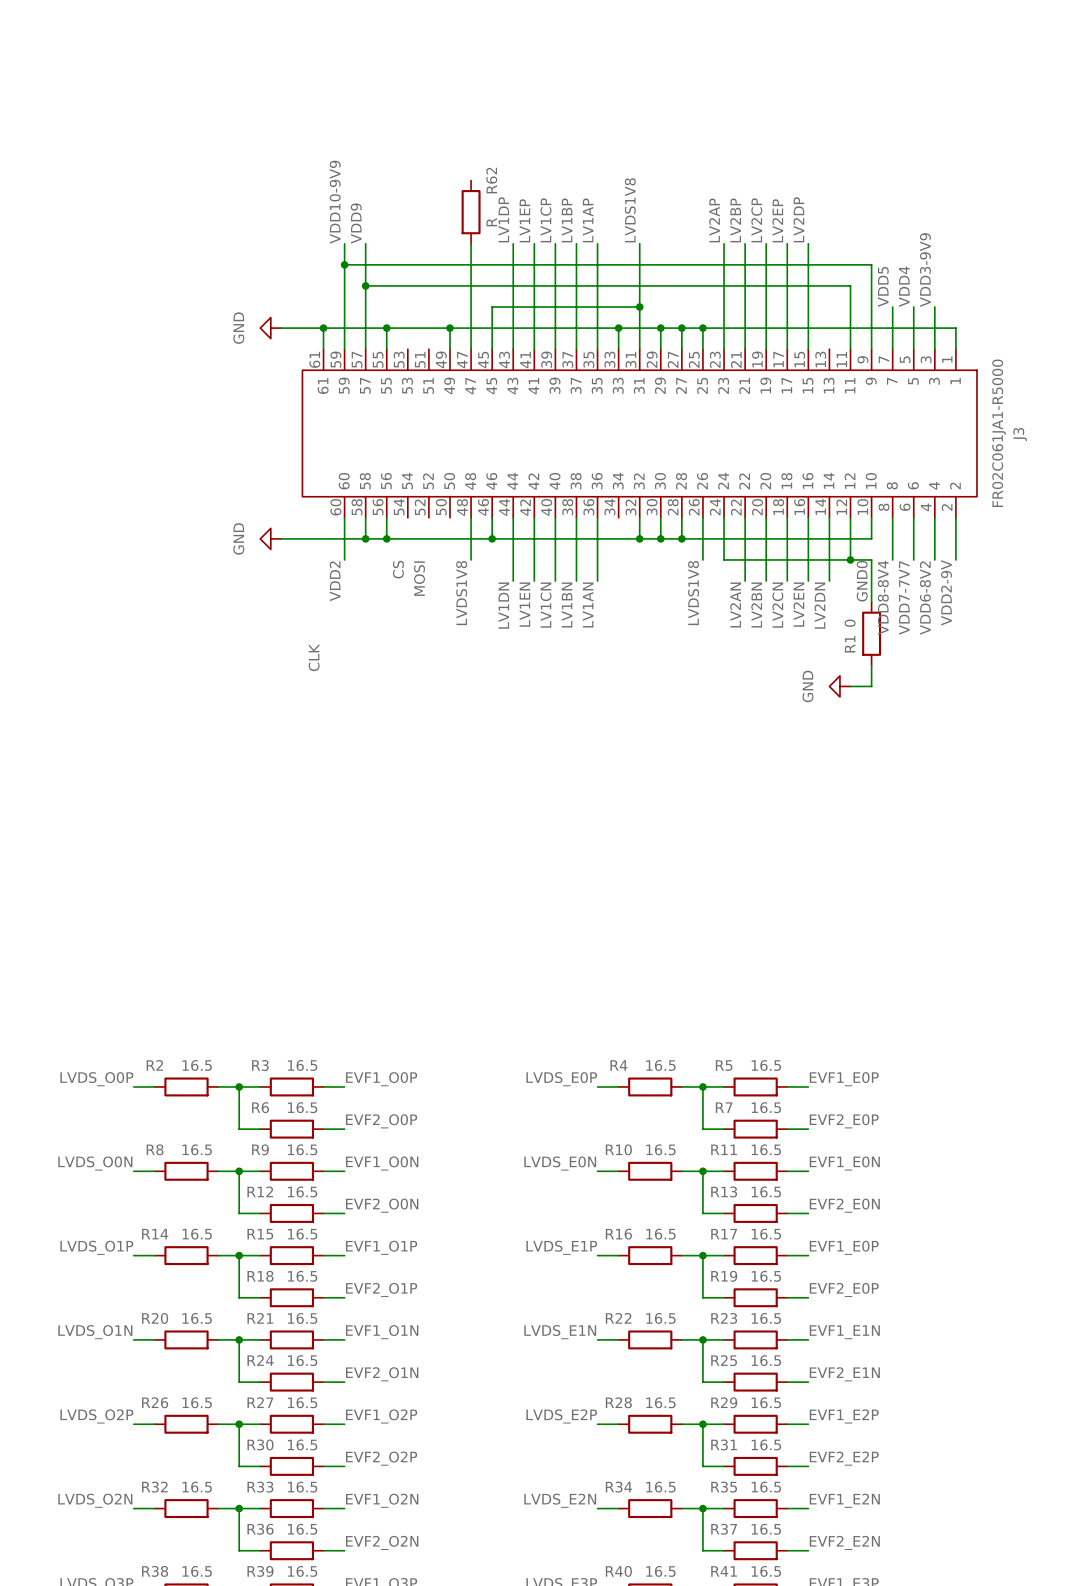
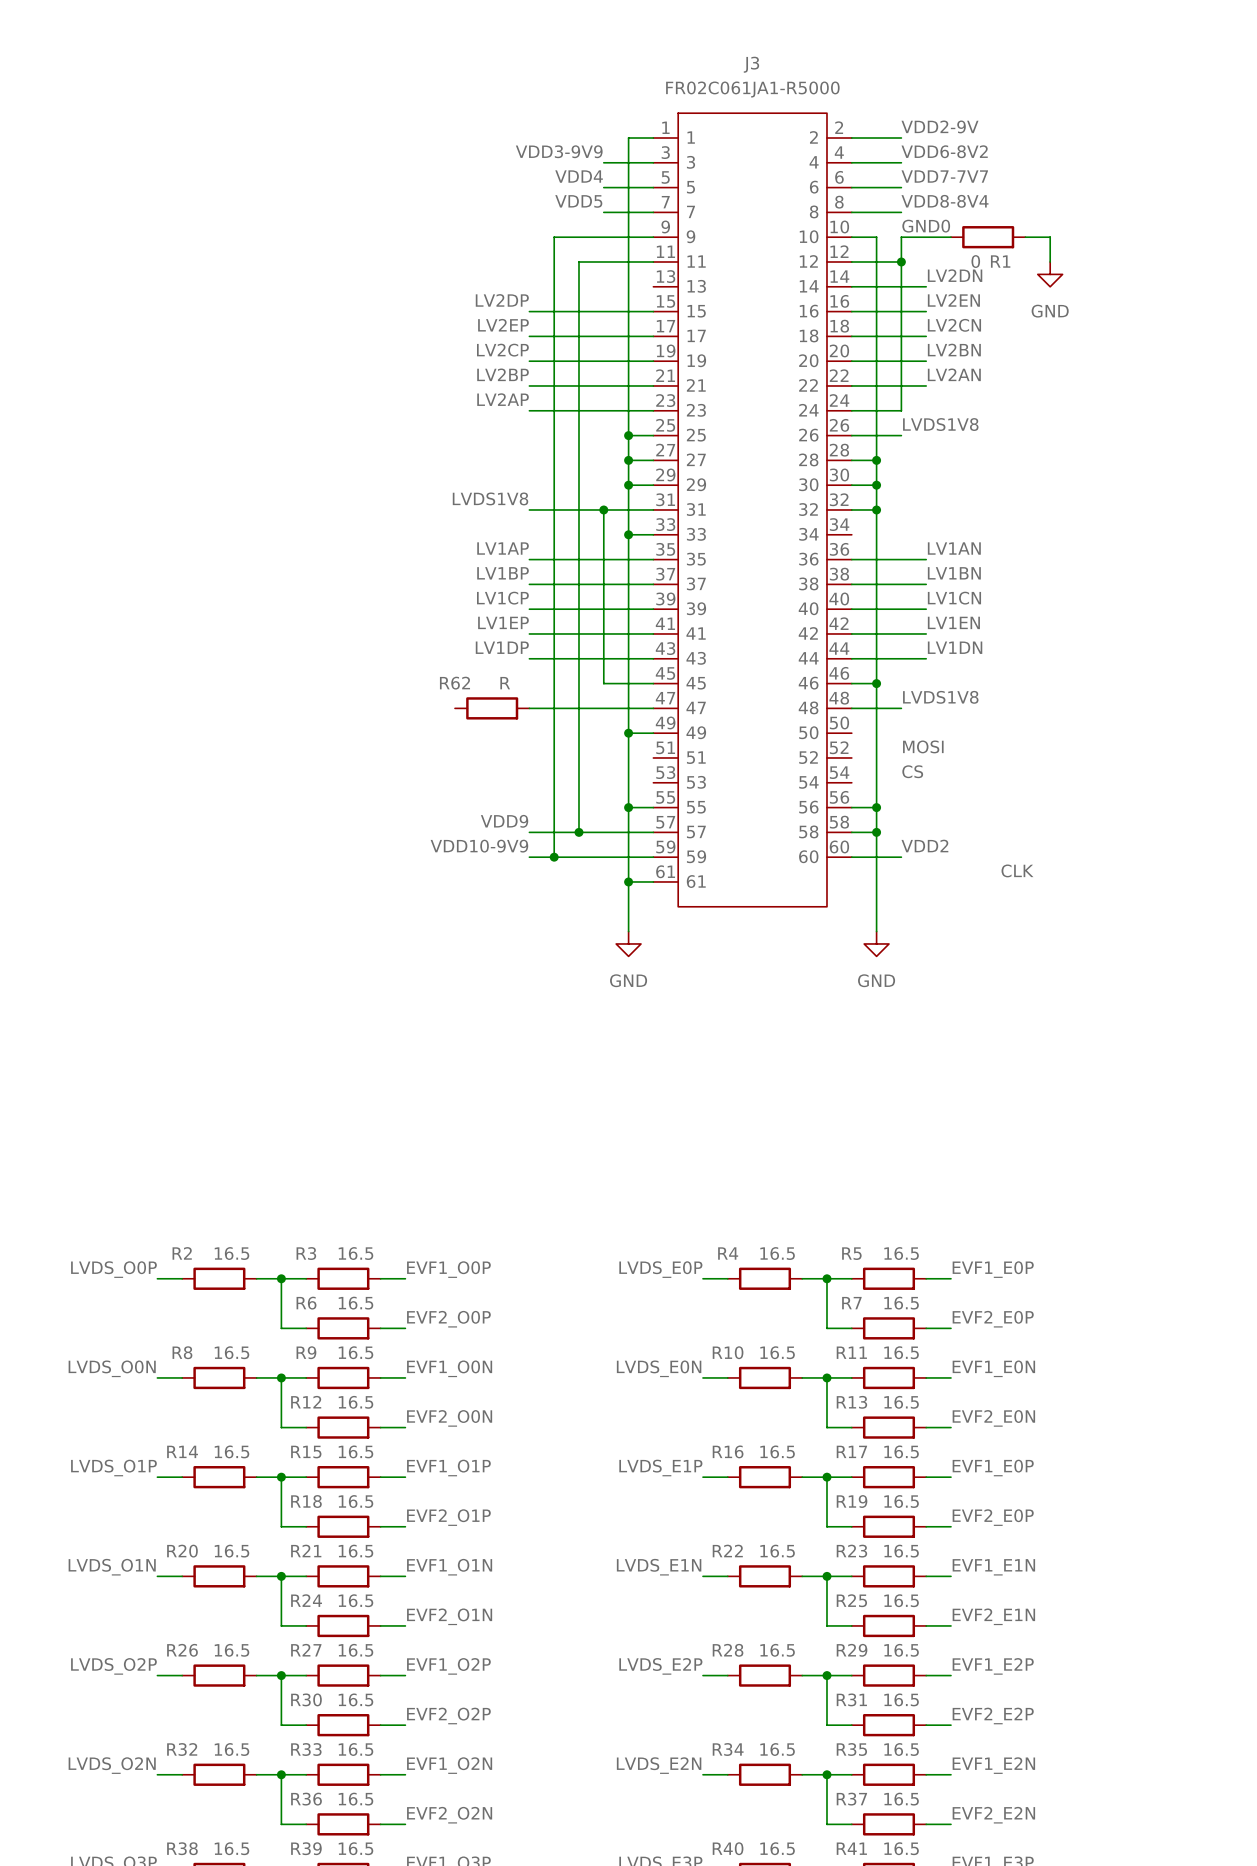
label: none -> VDD2-9V (940, 126)
wire: none -> (653, 138) (628, 138) (628, 286)
wire: none -> (851, 138) (901, 138)
label: none -> VDD3-9V9 (559, 151)
label: none -> VDD6-8V2 (944, 151)
wire: none -> (603, 162) (653, 162)
wire: none -> (851, 162) (901, 162)
label: none -> VDD4 (579, 176)
label: none -> VDD7-7V7 (944, 176)
wire: none -> (603, 187) (653, 187)
wire: none -> (851, 187) (901, 187)
label: none -> VDD5 (578, 201)
label: none -> VDD8-8V4 (945, 201)
R62 name position: R62 (491, 180) -> R62 (454, 683)
wire: none -> (603, 212) (653, 212)
wire: none -> (851, 212) (901, 212)
label: none -> GND0 (926, 226)
wire: none -> (653, 237) (554, 237) (554, 286)
wire: none -> (851, 237) (876, 237) (876, 286)
wire: none -> (950, 237) (901, 237) (901, 286)
wire: none -> (1025, 237) (1050, 237) (1050, 261)
label: VDD10-9V9 (335, 202) -> none
label: LVDS1V8 (630, 210) -> none
R62 rotation: 0° (471, 212) -> 90° clockwise (492, 708)
R62 position: (471, 212) -> (492, 708)
label: LV1DP (503, 219) -> none
label: LV2DP (798, 219) -> none
label: LV1EP (524, 220) -> none
label: LV1CP (545, 220) -> none
label: LV1BP (567, 220) -> none
label: LV1AP (588, 220) -> none
label: LV2AP (714, 220) -> none
label: LV2BP (735, 220) -> none
label: LV2CP (756, 220) -> none
label: LV2EP (777, 220) -> LV2DN (955, 275)
R62 value position: R (491, 222) -> R (505, 683)
wire: none -> (653, 261) (578, 261) (578, 361) (529, 361)
wire: none -> (851, 261) (901, 261)
junction: none -> (901, 261)
label: VDD9 (356, 223) -> none
power symbol: none -> GND (1050, 274)
wire: (344, 243) (344, 349) -> none
wire: (365, 243) (365, 349) -> none
wire: (513, 243) (513, 349) -> none
wire: (555, 243) (555, 349) -> (529, 410) (653, 410)
wire: (597, 243) (597, 349) -> none
wire: (639, 243) (639, 349) -> none
wire: (724, 243) (724, 349) -> (901, 410) (851, 410)
wire: (787, 243) (787, 349) -> (926, 286) (851, 286)
wire: (808, 243) (808, 349) -> none
label: none -> LV2DP (502, 300)
label: none -> LV2EN (953, 300)
wire: (344, 264) (449, 264) -> (529, 509) (653, 509)
junction: (344, 264) -> none
wire: (555, 264) (724, 264) -> none
wire: (787, 264) (871, 264) (871, 349) -> none
label: VDD3-9V9 (925, 270) -> none
label: none -> LV2EP (503, 325)
label: none -> LV2CN (954, 325)
wire: (365, 285) (449, 285) -> none
junction: (365, 285) -> none
wire: (555, 285) (724, 285) -> none
wire: (787, 285) (850, 285) (850, 349) -> none
label: VDD5 (883, 286) -> none
label: VDD4 (904, 286) -> none
label: none -> LV2CP (502, 350)
label: none -> LV2BN (954, 350)
wire: (555, 307) (639, 307) -> none
junction: (639, 307) -> none
wire: none -> (851, 361) (926, 361)
wire: (892, 307) (892, 349) -> none
wire: (913, 307) (913, 349) -> none
wire: (934, 307) (934, 349) -> none
label: none -> LV2BP (503, 374)
label: none -> LV2AN (954, 374)
power symbol: GND (270, 328) -> none
wire: (281, 328) (449, 328) (449, 349) -> none
wire: (323, 328) (323, 349) -> none
junction: (323, 328) -> none
wire: (386, 328) (386, 349) -> none
junction: (386, 328) -> none
junction: (449, 328) -> none
wire: (555, 328) (724, 328) -> none
wire: (618, 328) (618, 349) -> none
junction: (618, 328) -> none
wire: (660, 328) (660, 349) -> none
junction: (660, 328) -> none
wire: (681, 328) (681, 349) -> none
junction: (681, 328) -> none
junction: (702, 328) -> none
wire: (787, 328) (955, 328) (955, 349) -> none
label: none -> LV2AP (503, 399)
wire: none -> (554, 410) (554, 609)
wire: none -> (578, 410) (578, 609)
wire: none -> (628, 410) (628, 609)
wire: none -> (876, 410) (876, 609)
label: none -> LVDS1V8 (940, 424)
junction: none -> (628, 435)
wire: none -> (628, 460) (653, 460)
junction: none -> (628, 460)
wire: none -> (851, 460) (876, 460)
junction: none -> (876, 460)
wire: none -> (628, 485) (653, 485)
junction: none -> (628, 485)
wire: none -> (851, 485) (876, 485)
junction: none -> (876, 485)
wire: none -> (603, 509) (603, 609)
junction: none -> (603, 509)
J3 rotation: 0° (639, 433) -> 90° counterclockwise (752, 509)
wire: none -> (851, 509) (876, 509)
junction: none -> (876, 509)
wire: none -> (628, 534) (653, 534)
junction: none -> (628, 534)
label: none -> LV1AP (503, 548)
label: none -> LV1AN (954, 548)
wire: none -> (529, 559) (653, 559)
wire: none -> (851, 559) (926, 559)
label: none -> LV1BP (503, 573)
label: none -> LV1BN (954, 573)
label: none -> LV1CP (502, 598)
label: none -> LV1CN (954, 598)
wire: (344, 517) (344, 559) -> none
wire: (365, 517) (365, 538) -> none
wire: (386, 517) (386, 538) -> none
wire: none -> (529, 609) (653, 609)
wire: (555, 517) (555, 581) -> (603, 683) (653, 683)
wire: (597, 517) (597, 581) -> none
wire: (639, 517) (639, 538) -> none
wire: (660, 517) (660, 538) -> none
wire: (681, 517) (681, 538) -> none
wire: (724, 517) (724, 559) -> (851, 609) (926, 609)
wire: (766, 517) (766, 581) -> none
wire: (787, 517) (787, 581) -> none
wire: (808, 517) (808, 581) -> none
wire: (829, 517) (829, 581) -> none
wire: (850, 517) (850, 559) -> none
wire: (871, 517) (871, 538) (787, 538) -> none
wire: (892, 517) (892, 559) -> none
wire: (913, 517) (913, 559) -> none
wire: (934, 517) (934, 559) -> none
wire: (955, 517) (955, 559) -> none
label: none -> LV1EP (503, 622)
label: none -> LV1EN (953, 622)
power symbol: GND (270, 538) -> none
wire: (281, 538) (449, 538) -> none
junction: (365, 538) -> none
junction: (386, 538) -> none
wire: none -> (578, 633) (578, 832)
junction: (492, 538) -> none
wire: (555, 538) (724, 538) -> none
junction: (639, 538) -> none
junction: (660, 538) -> none
junction: (681, 538) -> none
label: none -> LV1DP (502, 647)
label: none -> LV1DN (955, 647)
wire: none -> (529, 658) (653, 658)
wire: none -> (554, 658) (554, 857)
wire: (787, 559) (871, 559) (871, 602) -> none
junction: (850, 559) -> none
label: CS (398, 569) -> none
label: MOSI (419, 578) -> none
label: VDD2 (335, 581) -> none
wire: none -> (628, 683) (628, 931)
wire: none -> (851, 683) (876, 683) (876, 931)
junction: none -> (876, 683)
label: GND0 (862, 581) -> none
label: VDD2-9V (946, 592) -> none
label rotation: 0° (461, 593) -> 90° clockwise (490, 498)
label position: LVDS1V8 (461, 593) -> LVDS1V8 (490, 498)
label rotation: 0° (693, 593) -> 90° clockwise (940, 697)
label position: LVDS1V8 (693, 593) -> LVDS1V8 (940, 697)
label: VDD8-8V4 (883, 597) -> none
label: VDD7-7V7 (904, 597) -> none
label: VDD6-8V2 (925, 598) -> none
wire: none -> (529, 708) (653, 708)
wire: none -> (851, 708) (901, 708)
label: LV1EN (524, 604) -> none
label: LV1BN (567, 604) -> none
label: LV1AN (588, 604) -> none
label: LV2AN (735, 604) -> none
label: LV2BN (756, 604) -> none
label: LV2EN (798, 604) -> none
label: LV1DN (503, 605) -> none
label: LV1CN (545, 605) -> none
label: LV2CN (777, 605) -> none
label: LV2DN (819, 605) -> none
wire: none -> (628, 733) (653, 733)
junction: none -> (628, 733)
R1 value position: 0 (850, 623) -> 0 (975, 261)
R1 rotation: 0° (871, 633) -> 90° clockwise (988, 237)
R1 position: (871, 633) -> (988, 237)
label: none -> MOSI (923, 746)
R1 name position: R1 (850, 644) -> R1 (1000, 261)
label: none -> CS (912, 771)
label: CLK (314, 657) -> none
wire: (871, 665) (871, 686) (850, 686) -> none
wire: none -> (628, 807) (653, 807)
junction: none -> (628, 807)
wire: none -> (851, 807) (876, 807)
junction: none -> (876, 807)
power symbol rotation: 0° (839, 686) -> 90° counterclockwise (876, 943)
power symbol position: GND (839, 686) -> GND (876, 943)
label: none -> VDD9 (504, 821)
wire: none -> (529, 832) (653, 832)
junction: none -> (578, 832)
wire: none -> (851, 832) (876, 832)
junction: none -> (876, 832)
label: none -> VDD10-9V9 (479, 846)
label: none -> VDD2 (924, 846)
wire: none -> (529, 857) (653, 857)
junction: none -> (554, 857)
wire: none -> (851, 857) (901, 857)
label: none -> CLK (1017, 870)
wire: none -> (628, 881) (653, 881)
junction: none -> (628, 881)
power symbol: none -> GND (628, 943)

